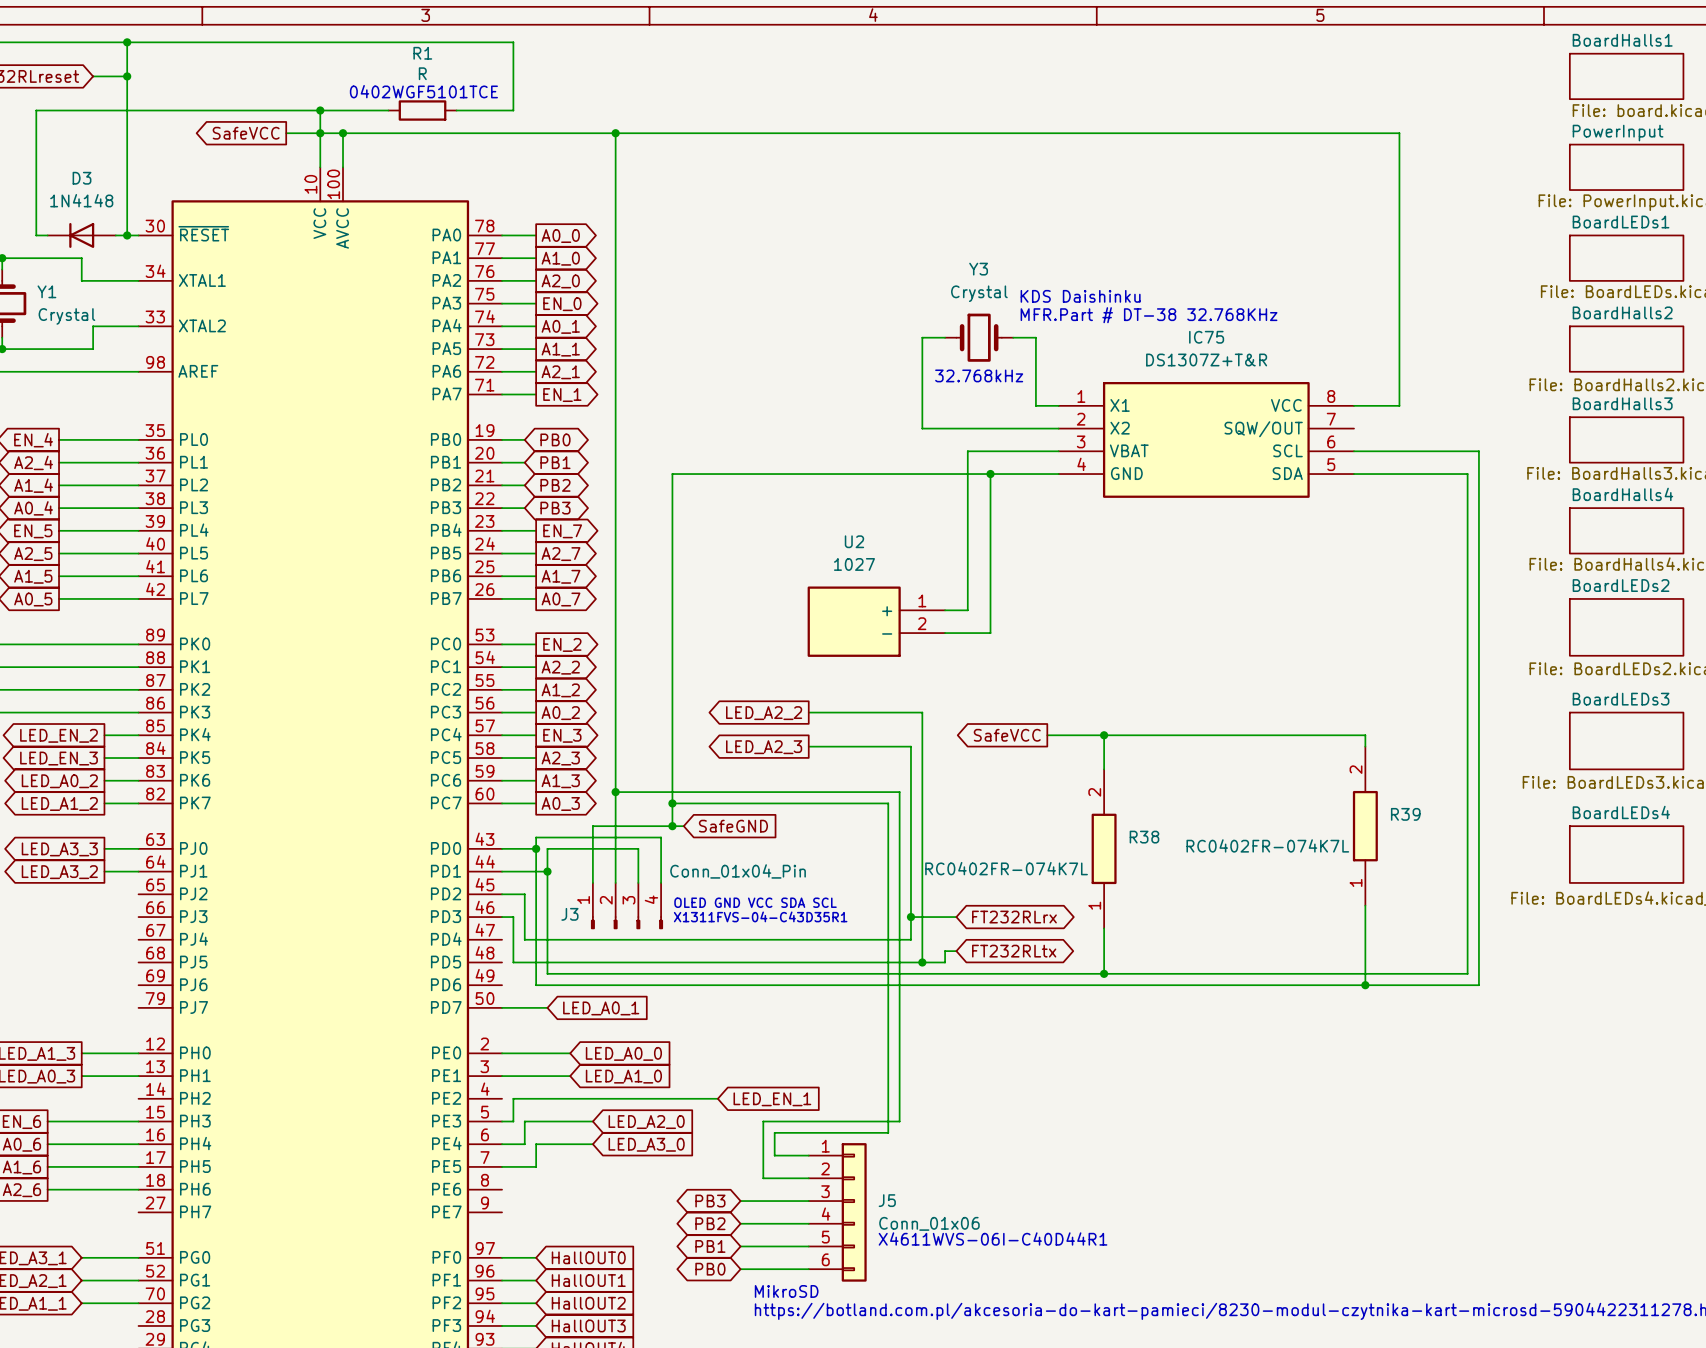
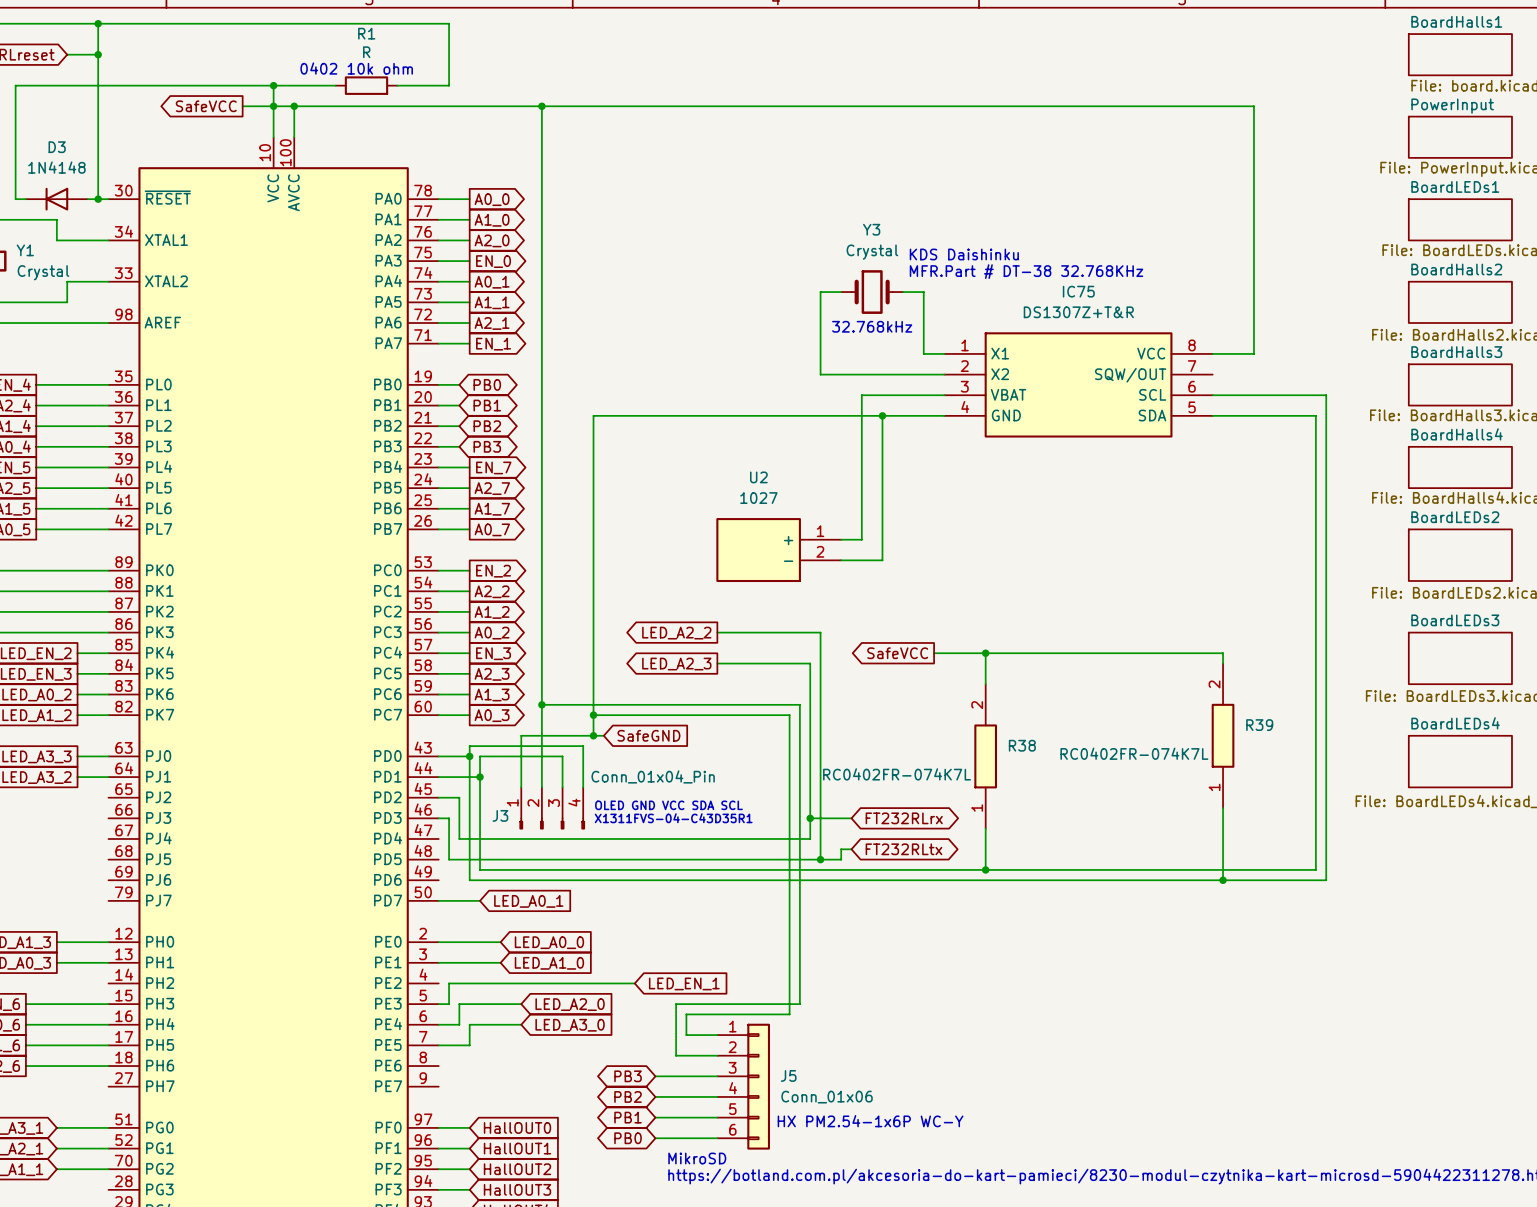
text: 0402WGF5101TCE (423, 91) -> 0402 10k ohm (356, 68)
text: X4611WVS-06I-C40D44R1 (993, 1238) -> none
text: none -> HX PM2.54-1x6P WC-Y (870, 1121)

